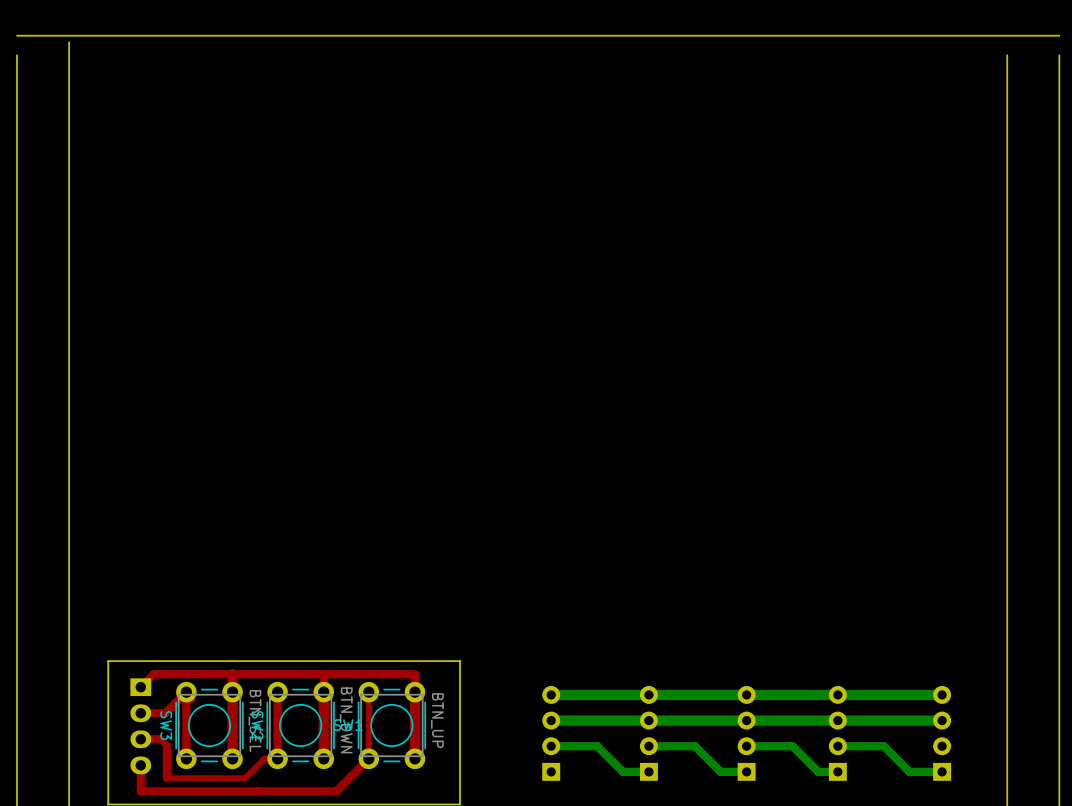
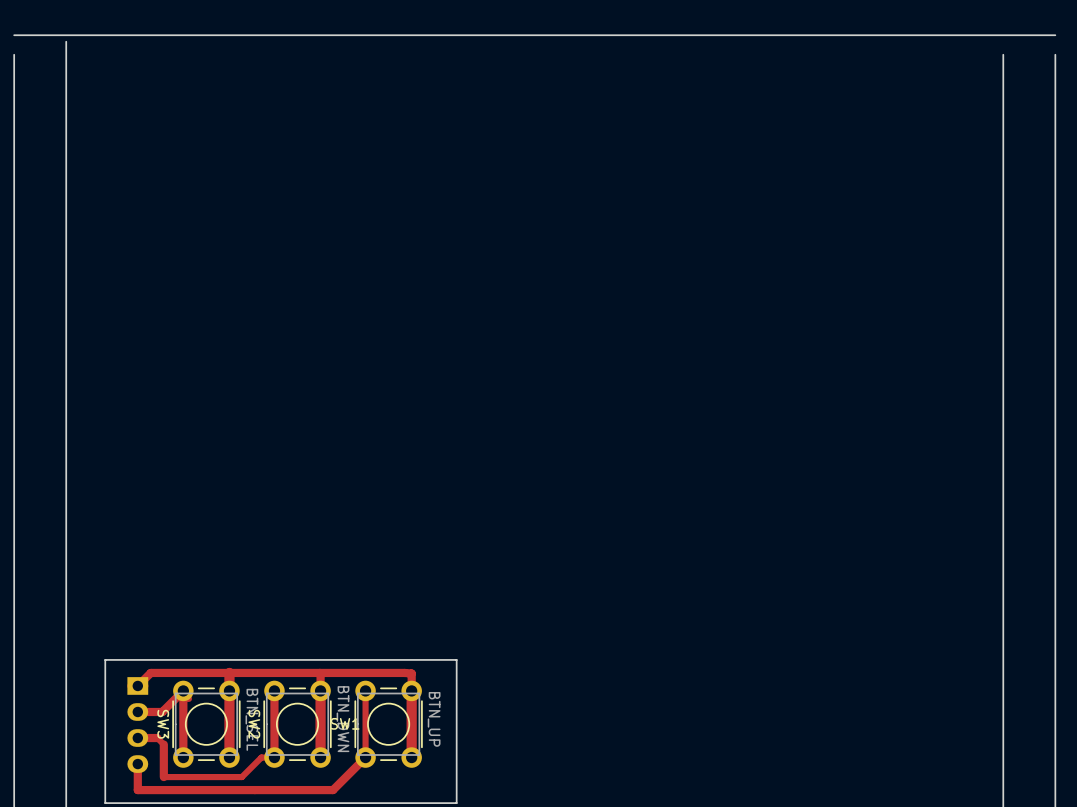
bottom track: (942, 694) (551, 694) -> none
bottom track: (942, 720) (551, 720) -> none
part: (551, 733) -> none
part: (648, 733) -> none
part: (746, 733) -> none
part: (837, 733) -> none
part: (942, 733) -> none
bottom track: (551, 746) (597, 746) (622, 771) (648, 771) -> none
bottom track: (648, 746) (694, 746) (720, 771) (746, 771) -> none
bottom track: (746, 746) (792, 746) (818, 771) (837, 771) -> none
bottom track: (837, 746) (883, 746) (909, 771) (942, 771) -> none

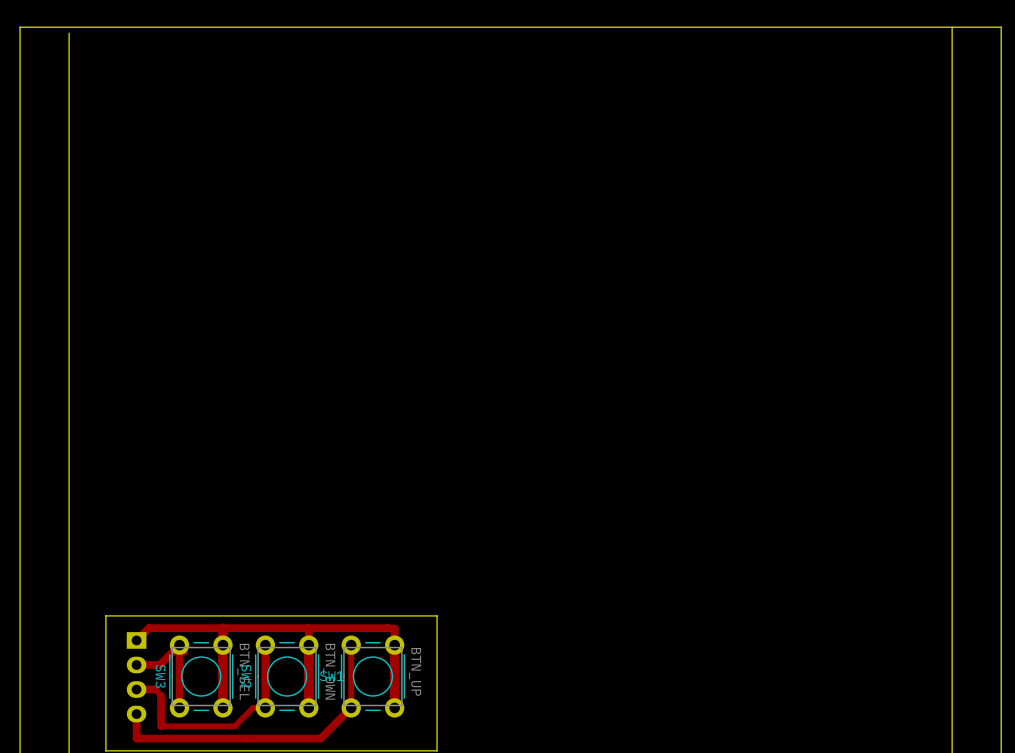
board edge: none -> (20, 27) (20, 45)
board edge: none -> (952, 27) (952, 45)
board edge: none -> (1001, 27) (1001, 45)

